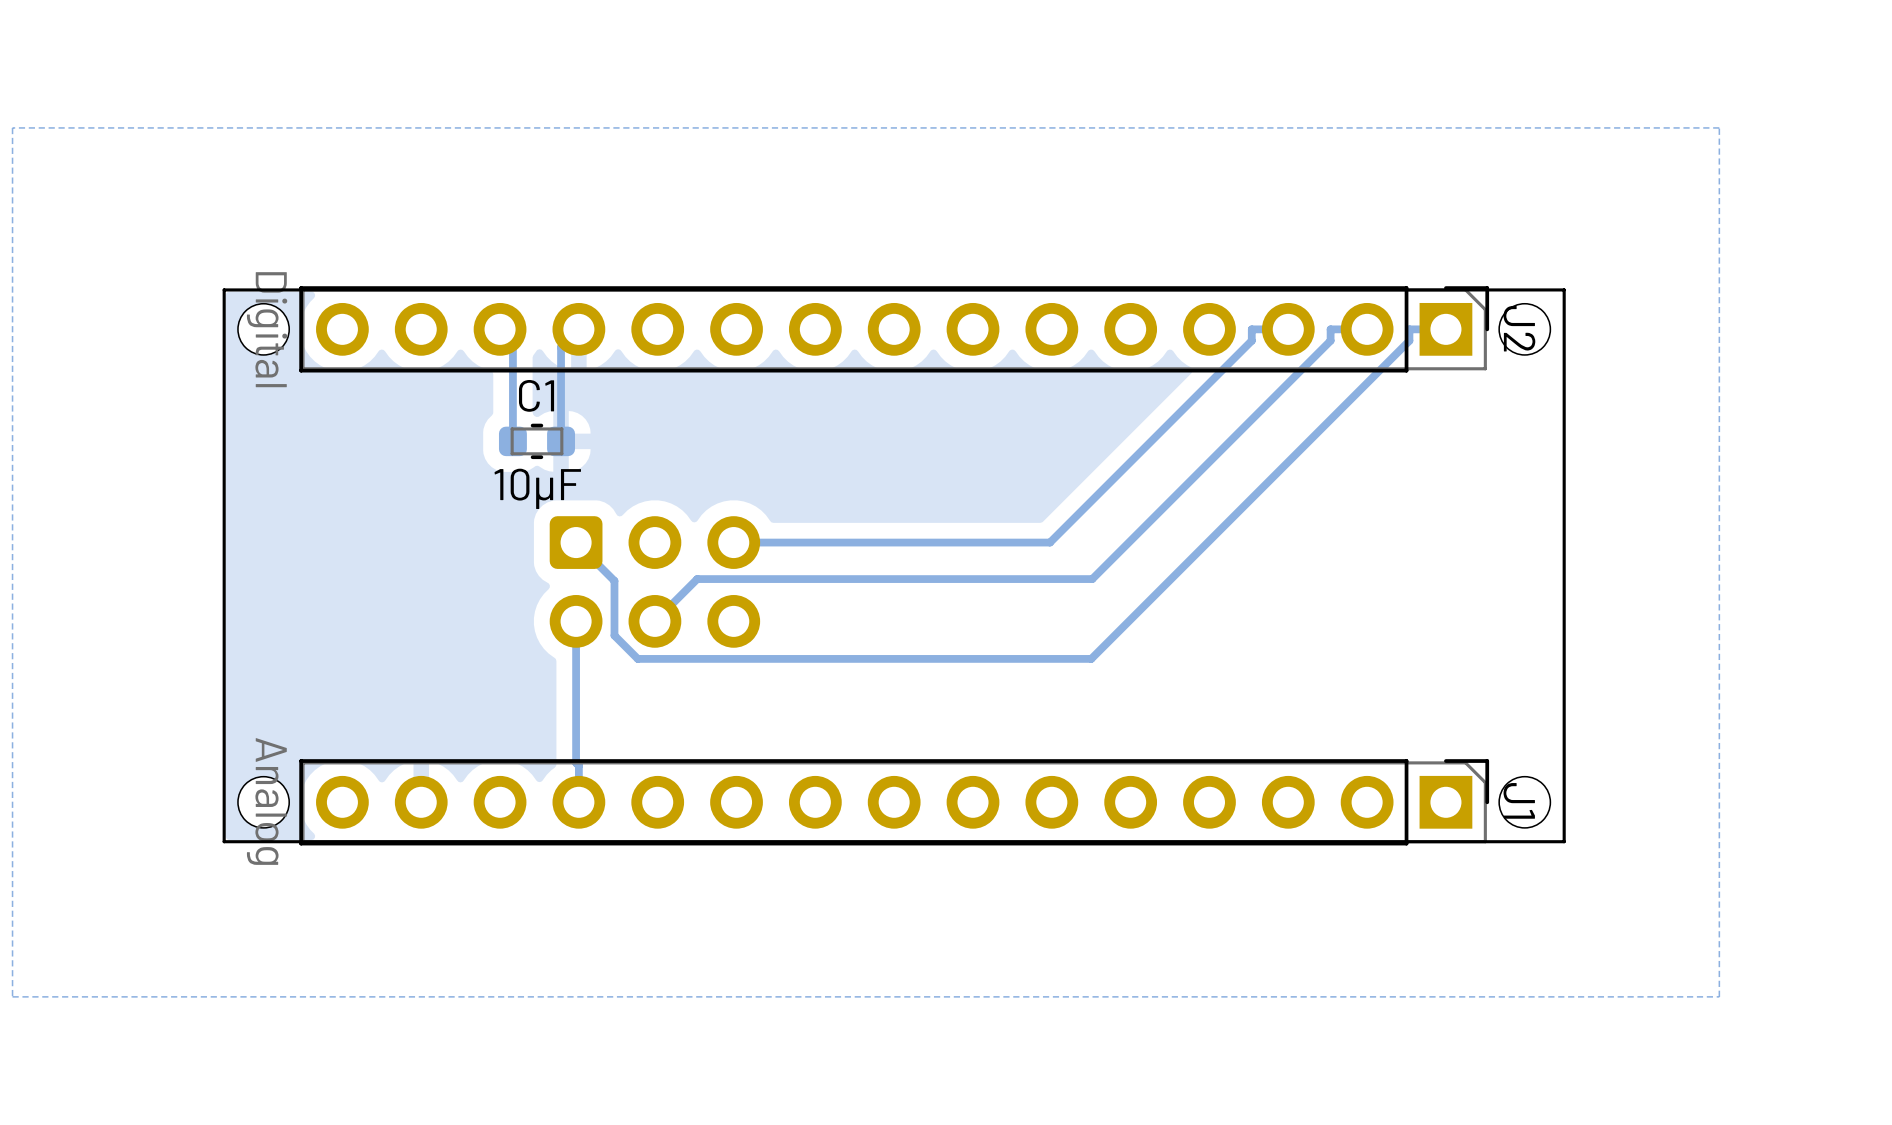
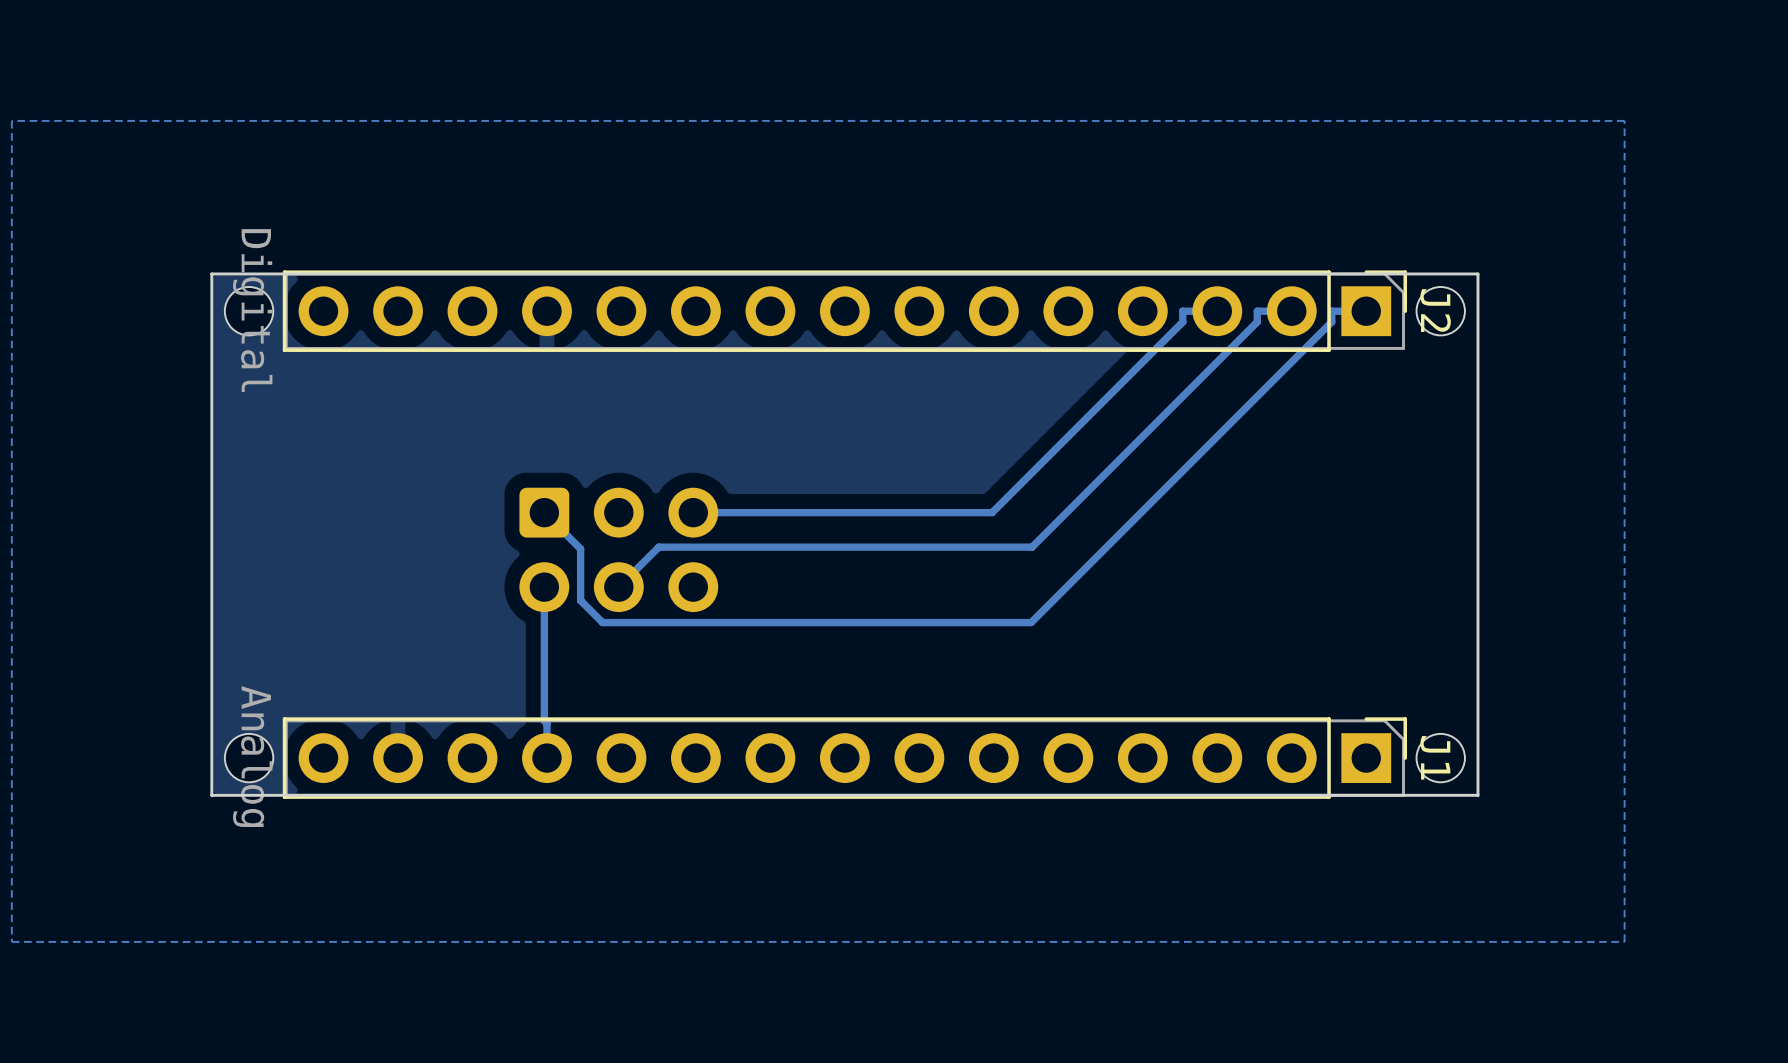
track: (500, 329) (512, 342) (512, 441) -> none
track: (578, 329) (561, 347) (561, 441) -> none
C1: 10µF (536, 441) -> none

